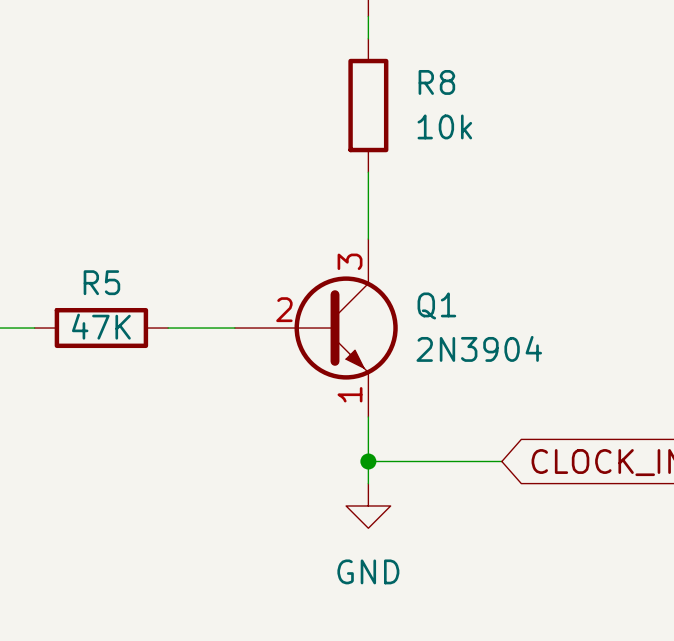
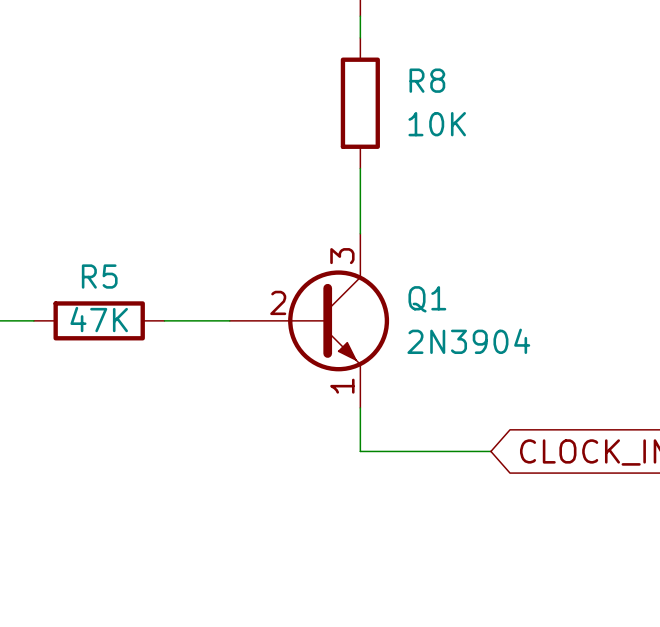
R8 value: 10k (444, 126) -> 10K (437, 124)
wire: (368, 461) (368, 483) -> none
junction: (368, 461) -> none
power symbol: GND (368, 505) -> none

